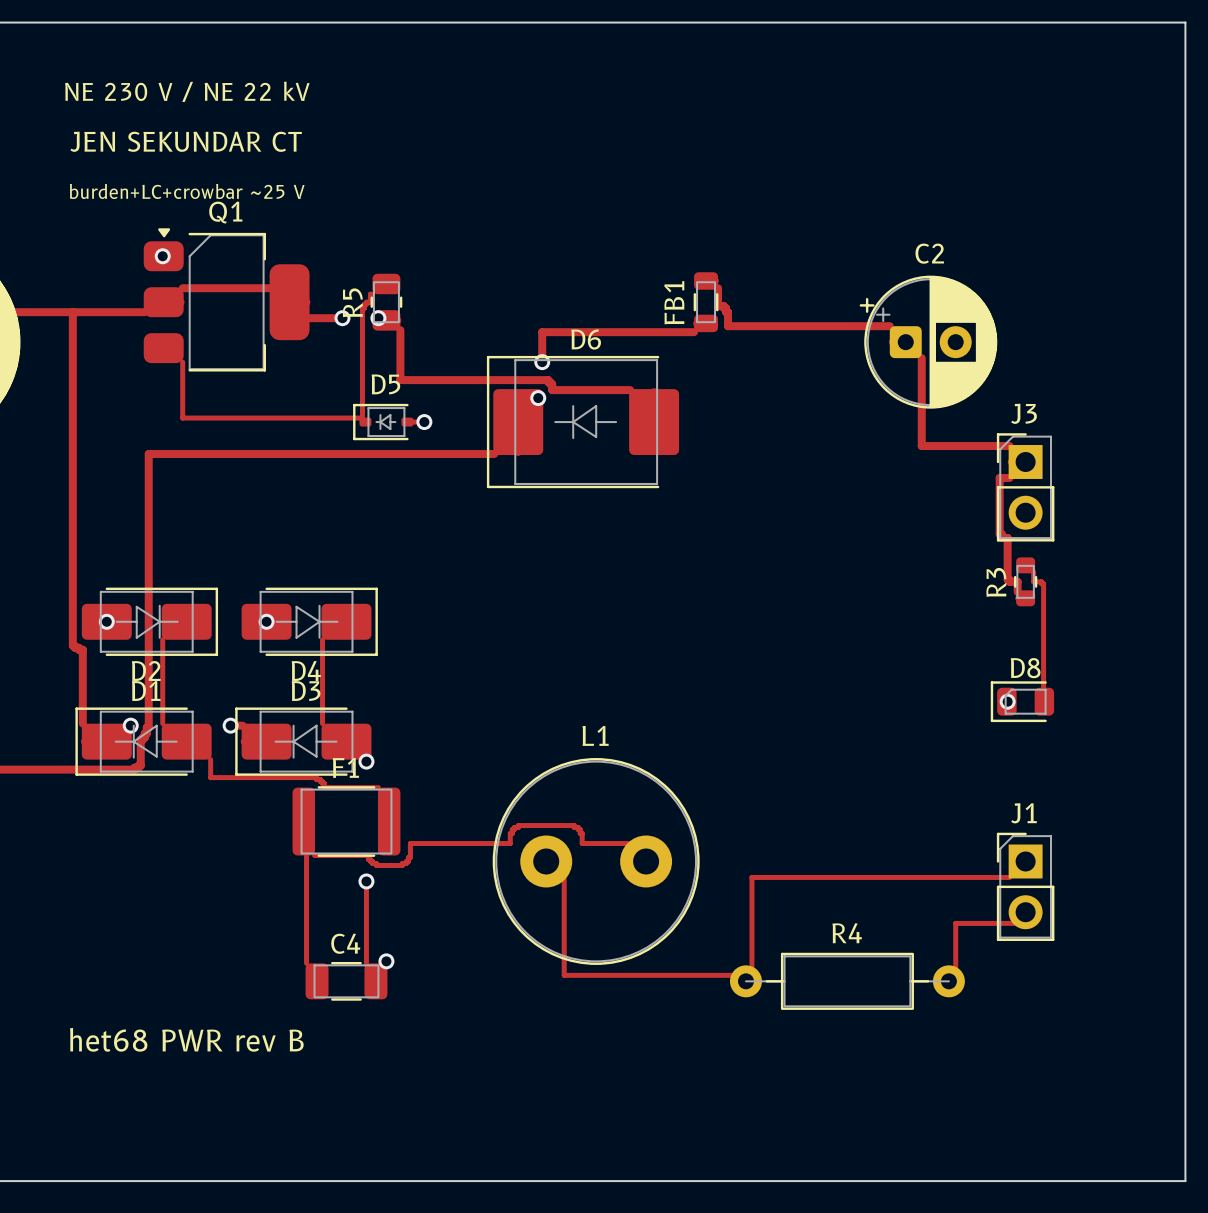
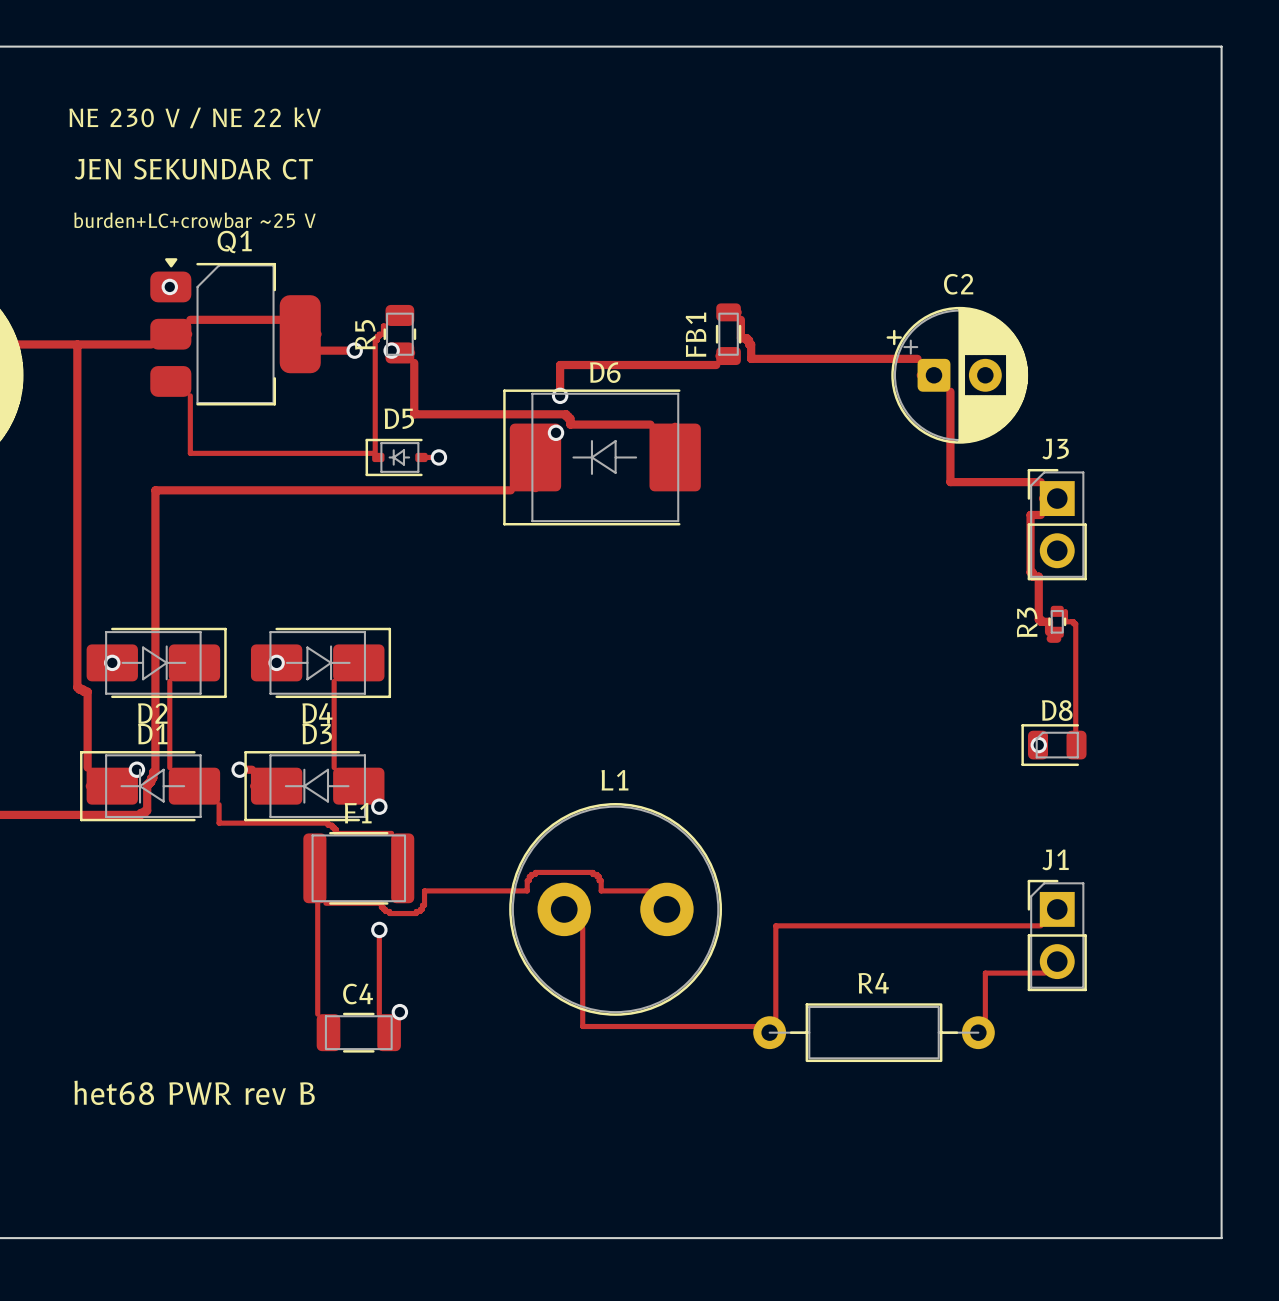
R3 footprint: [1013, 557, 1038, 607] -> [1048, 605, 1067, 638]

